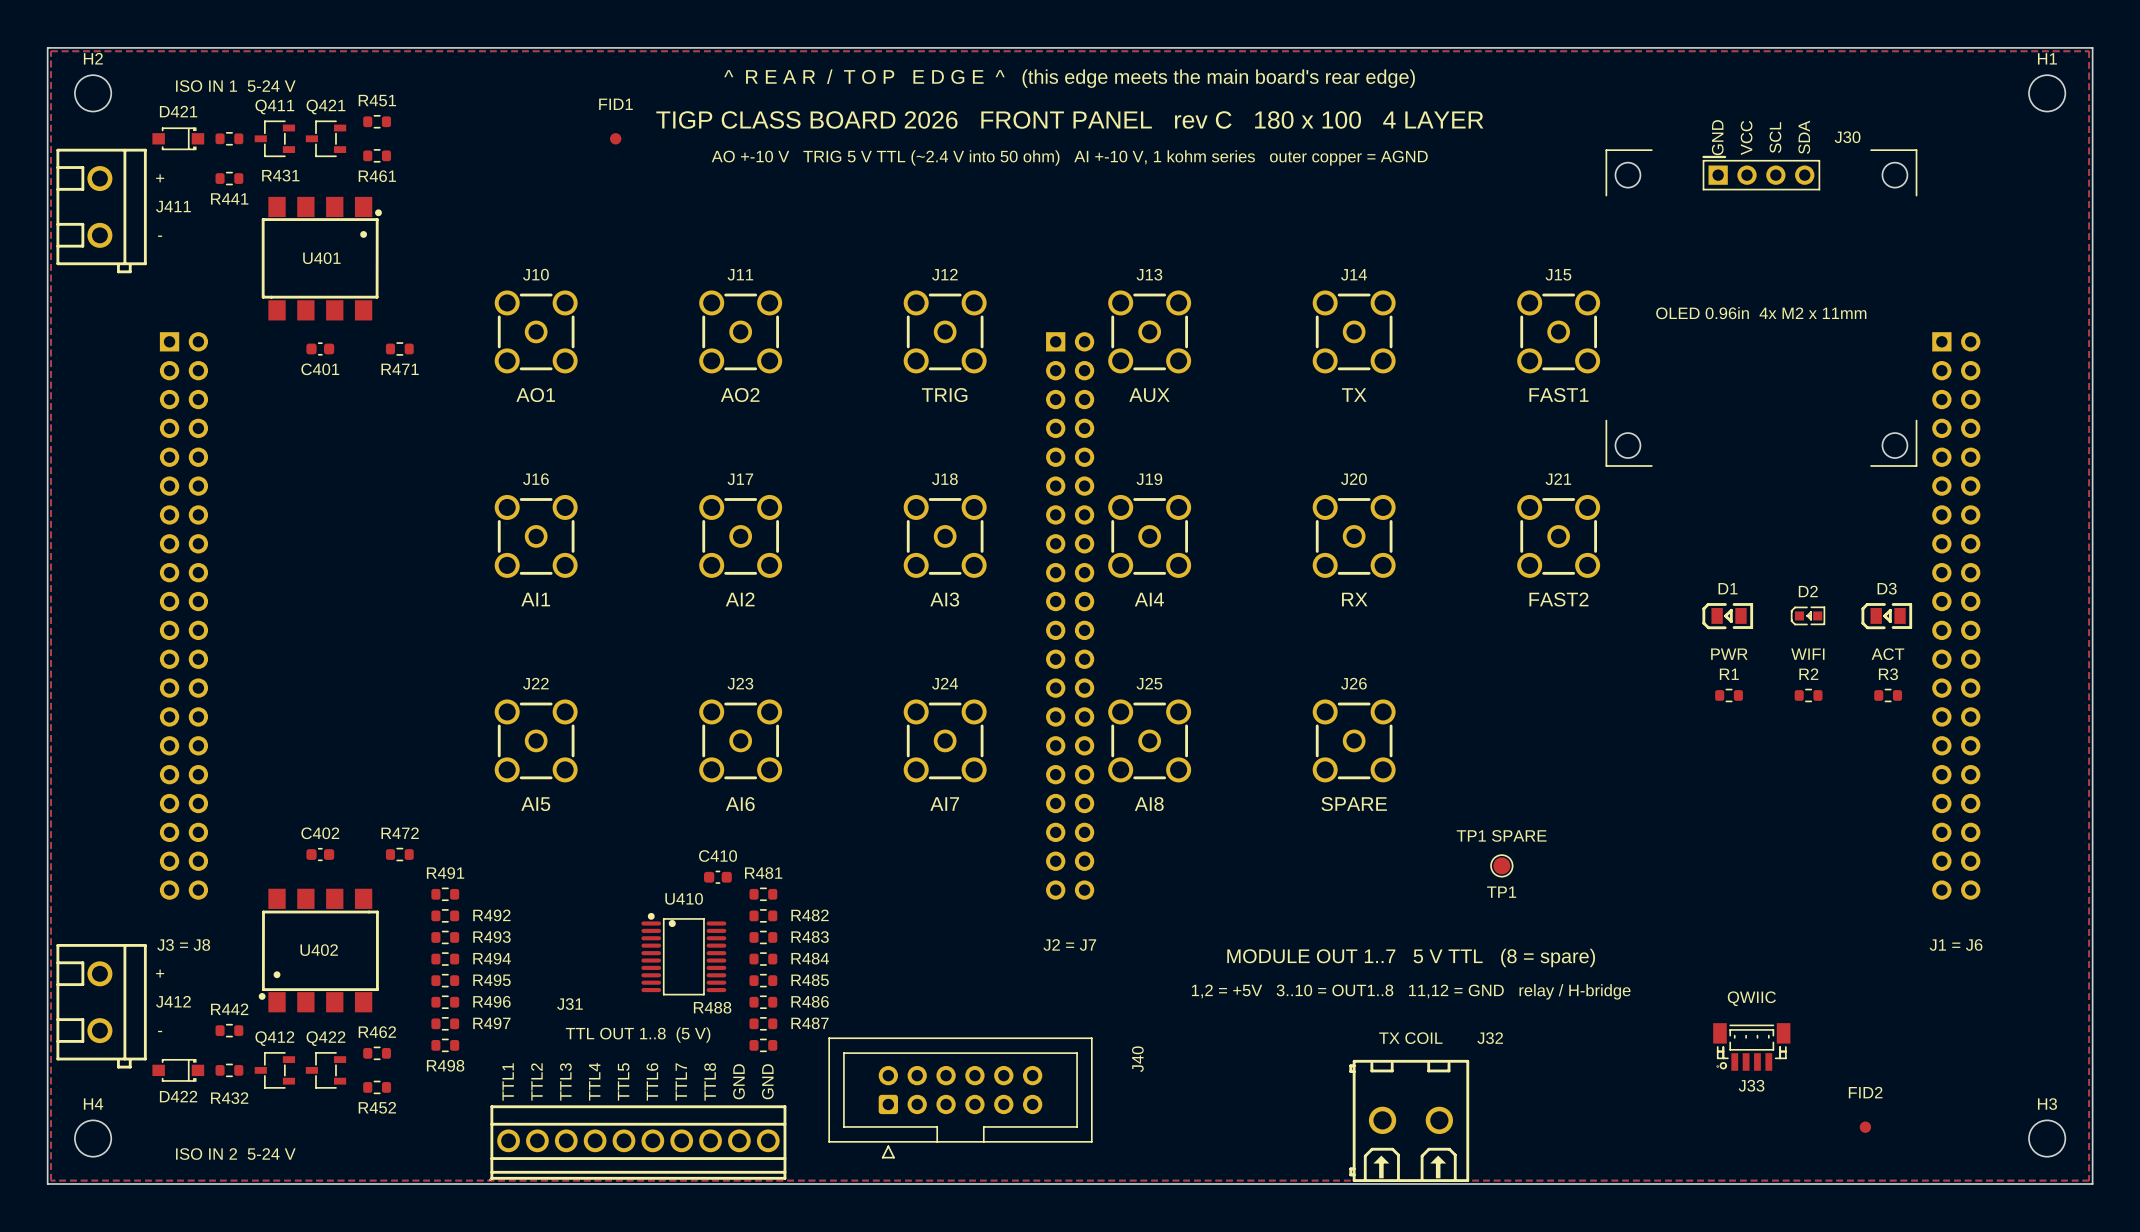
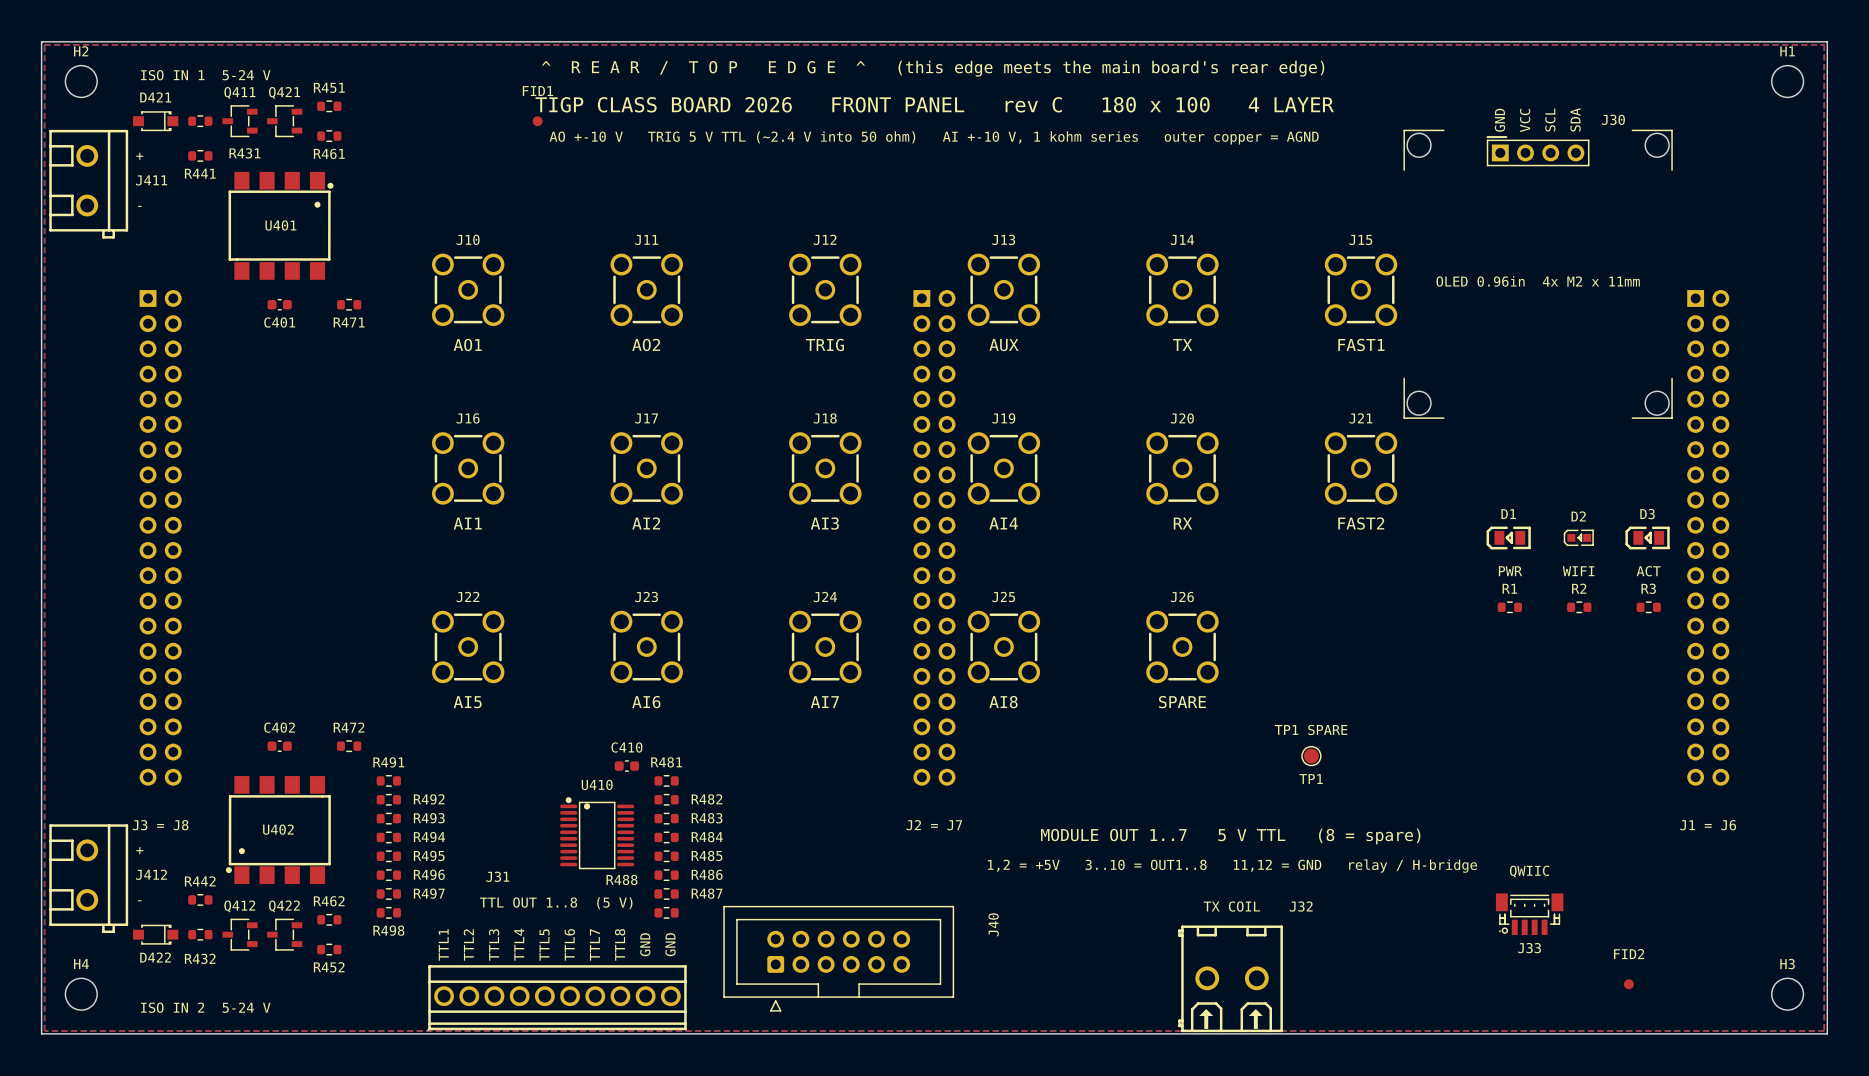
J30 footprint: [1605, 149, 1918, 467] -> [1403, 129, 1673, 419]

